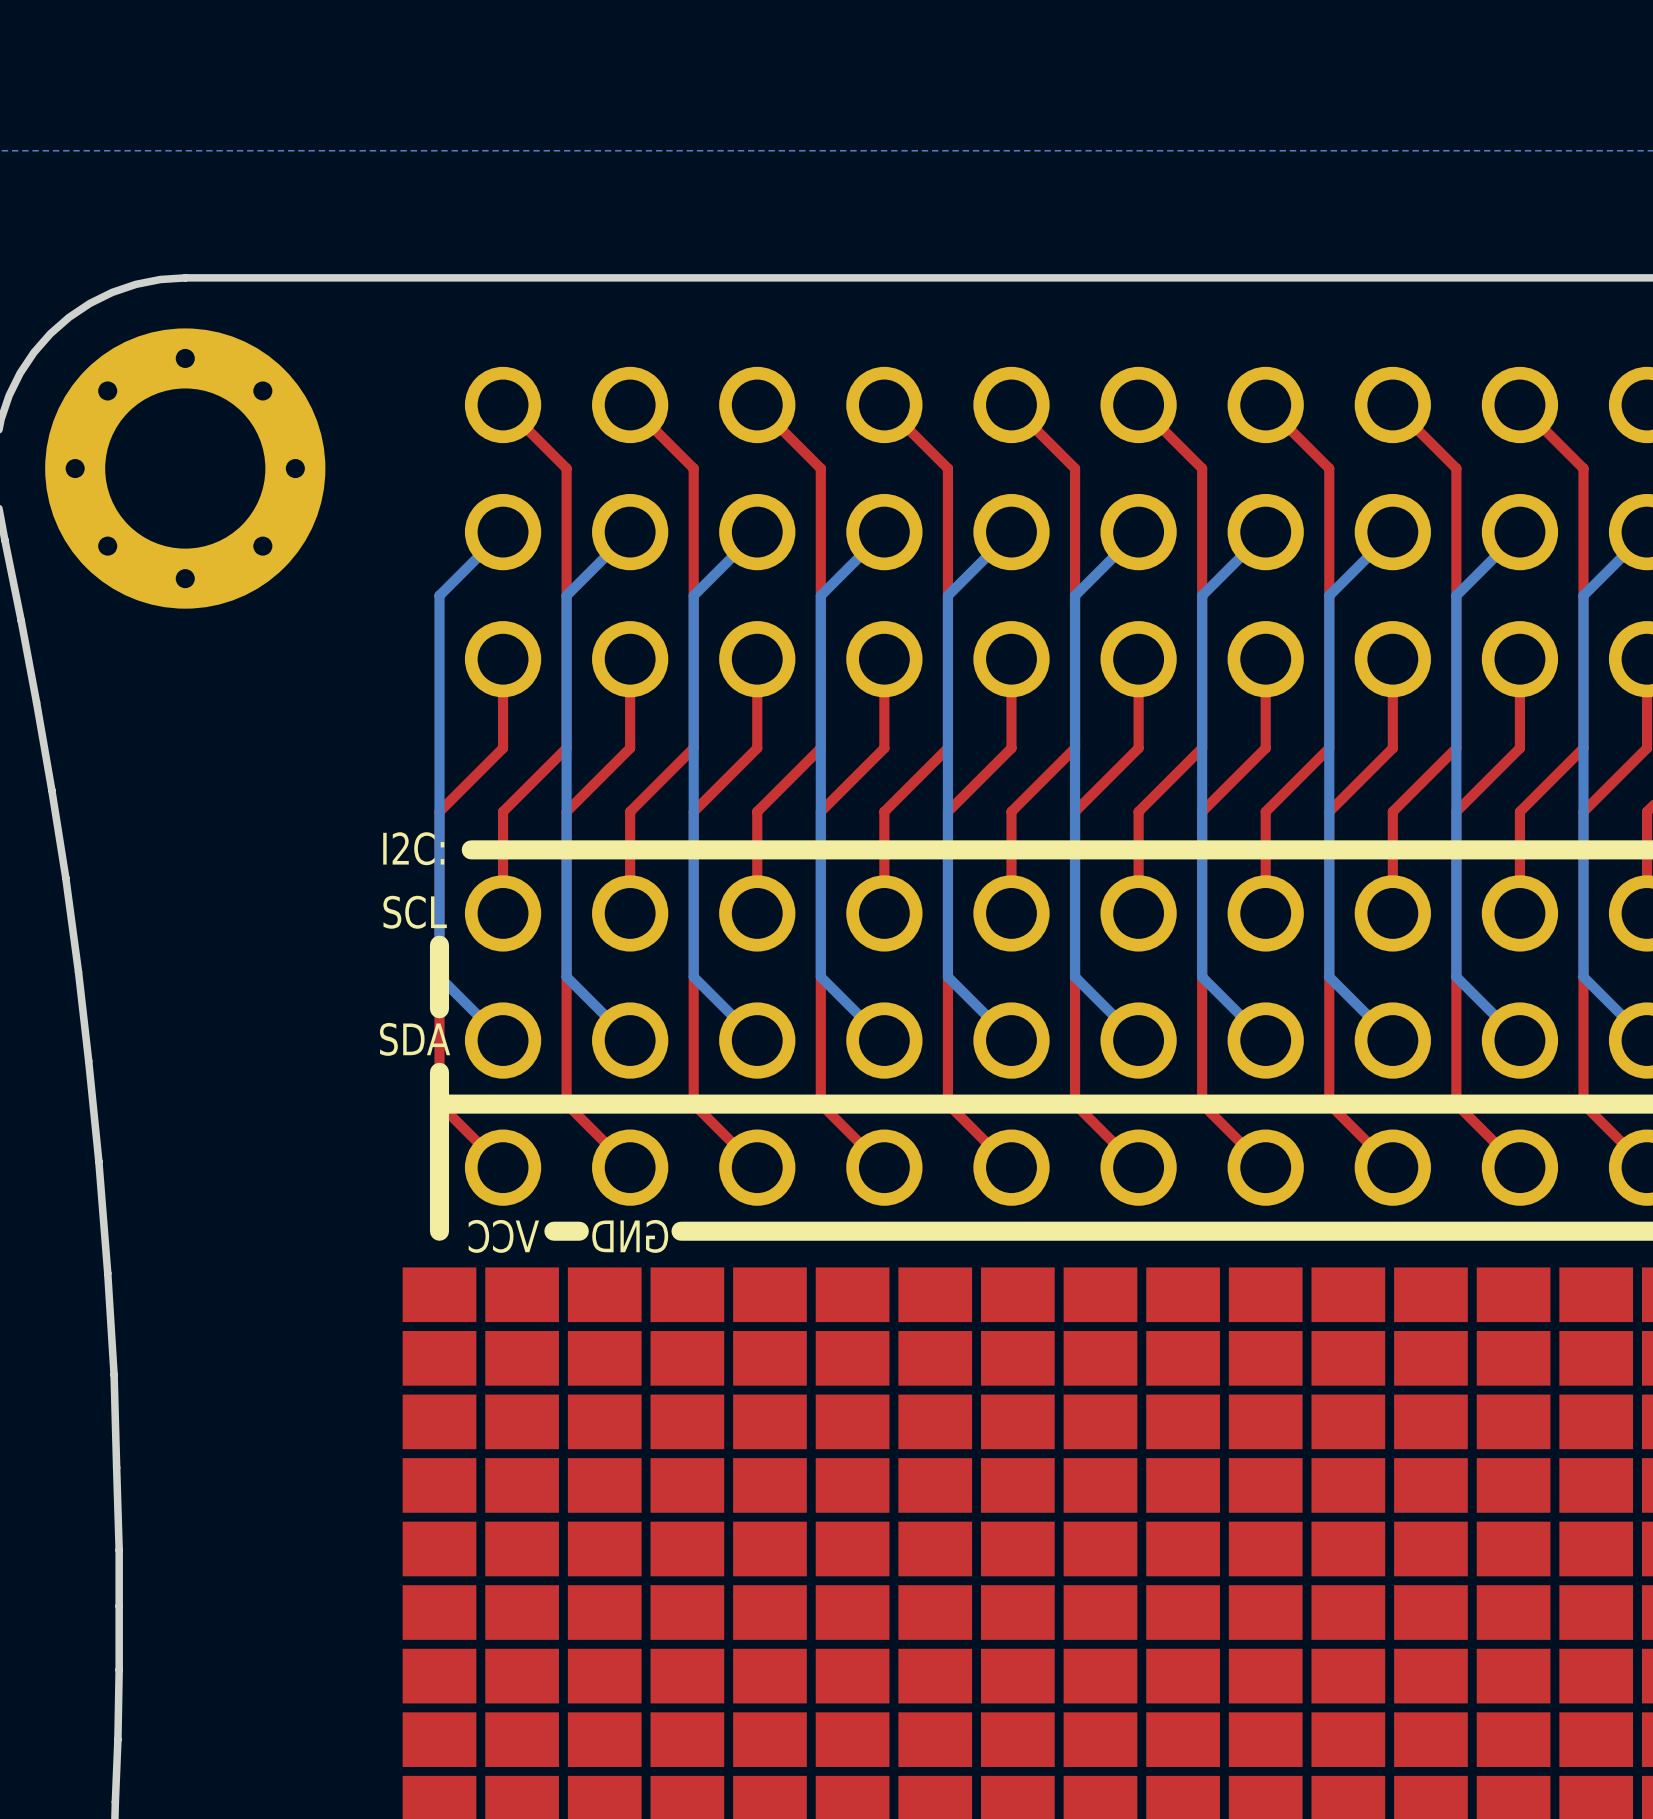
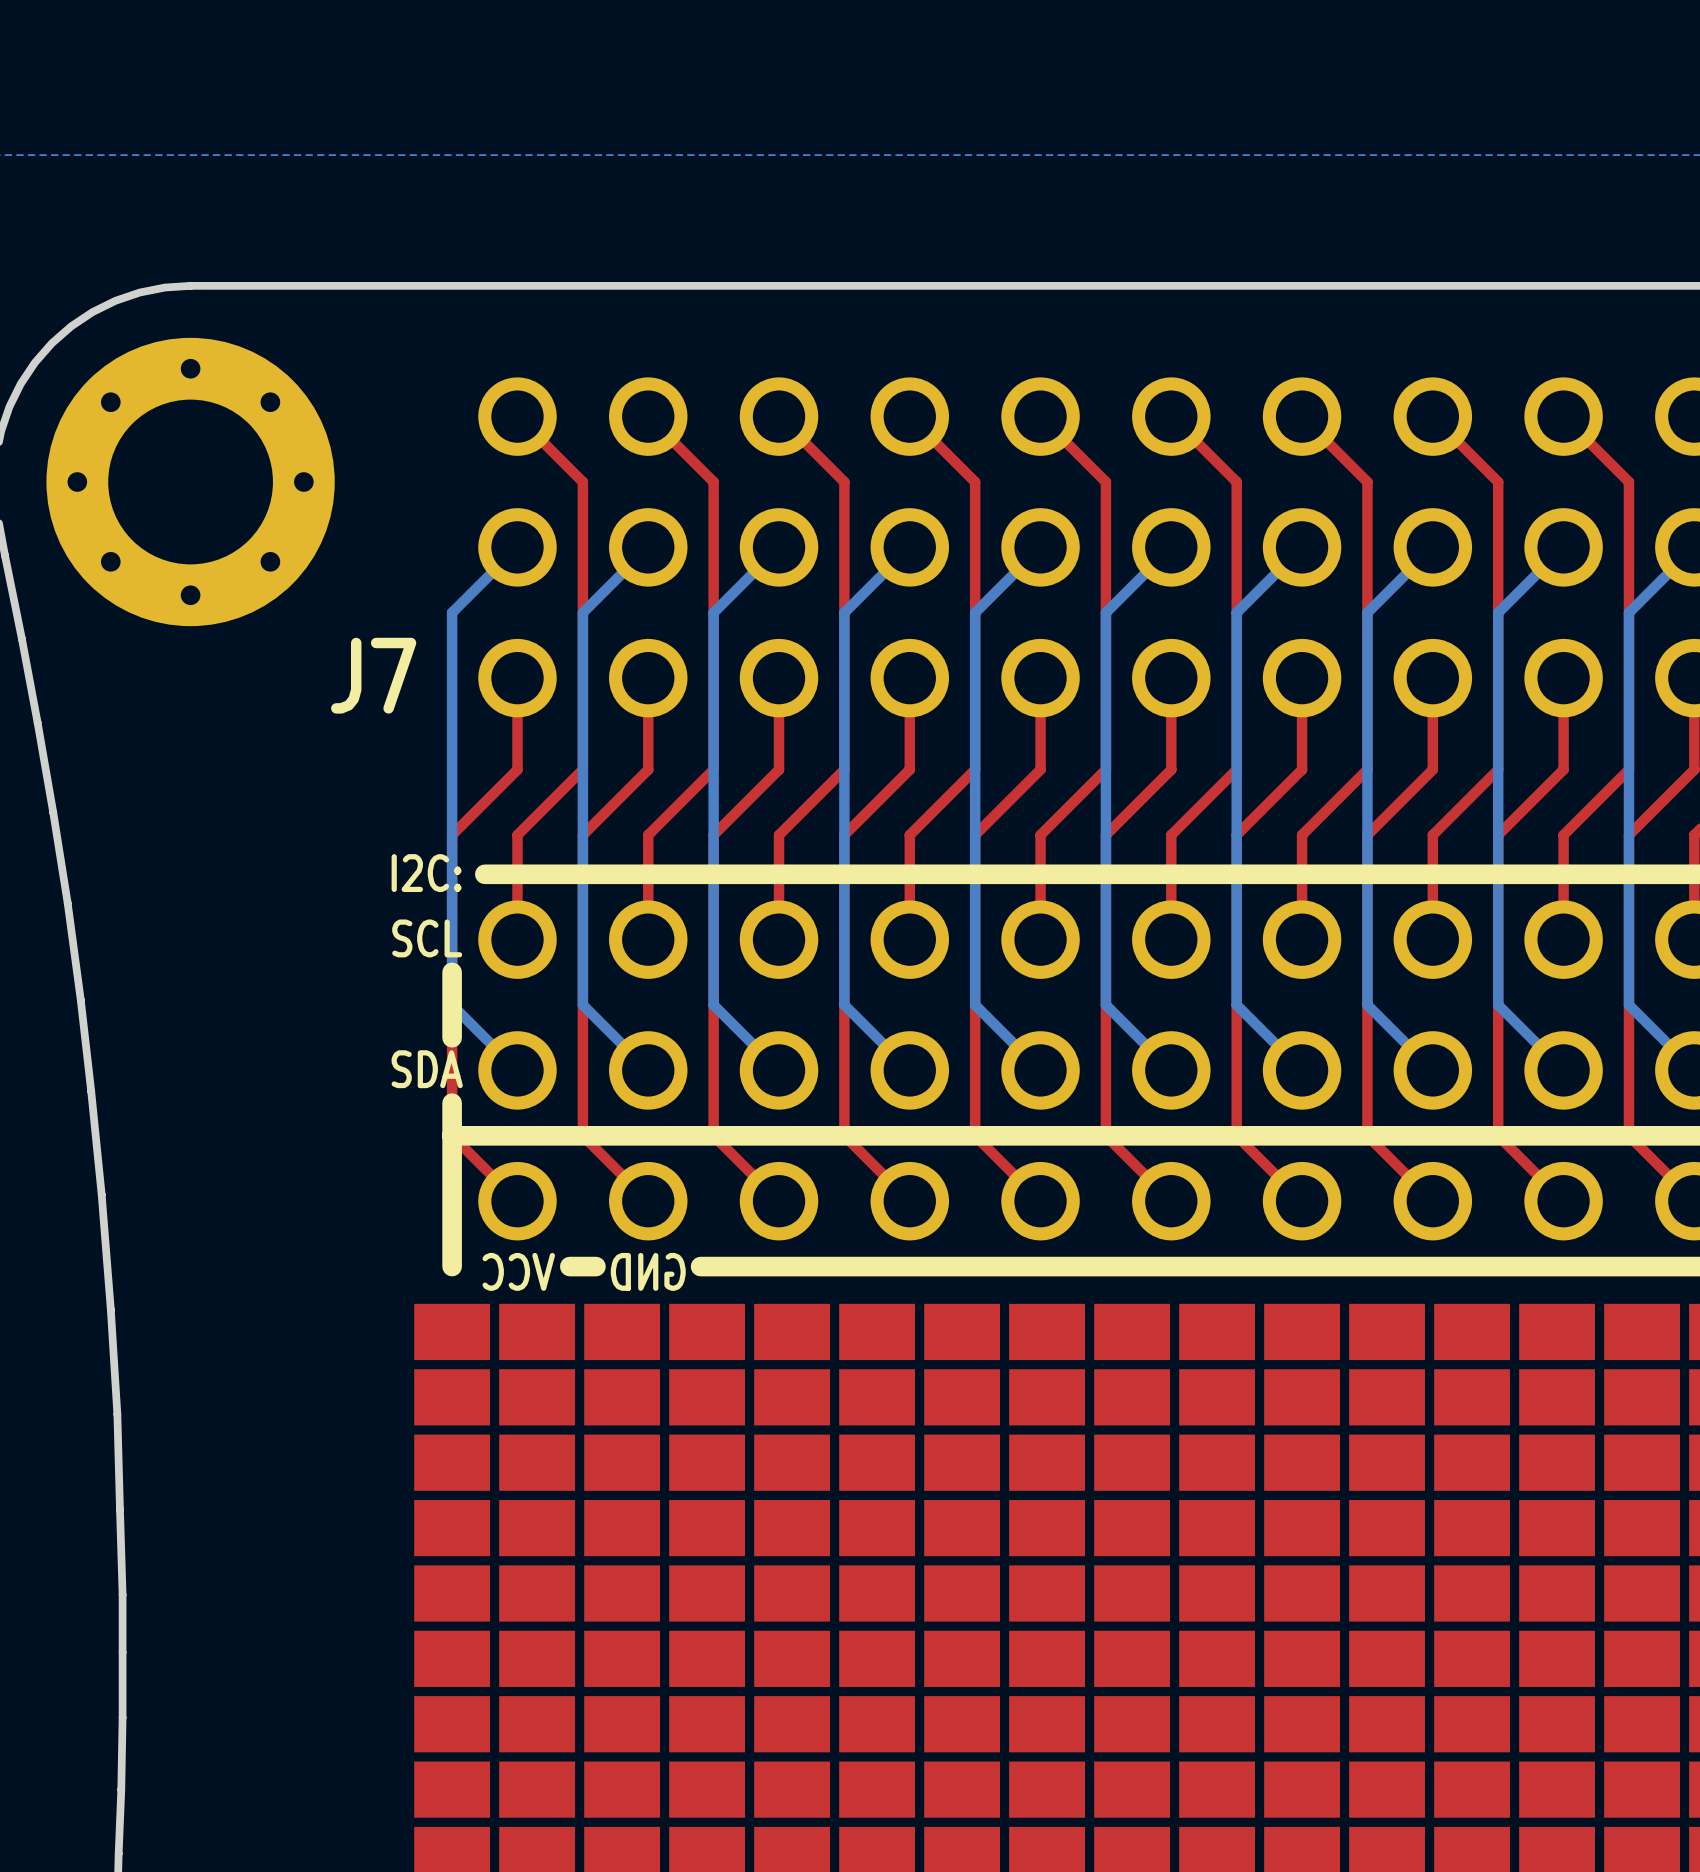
text: none -> J7 (373, 675)

